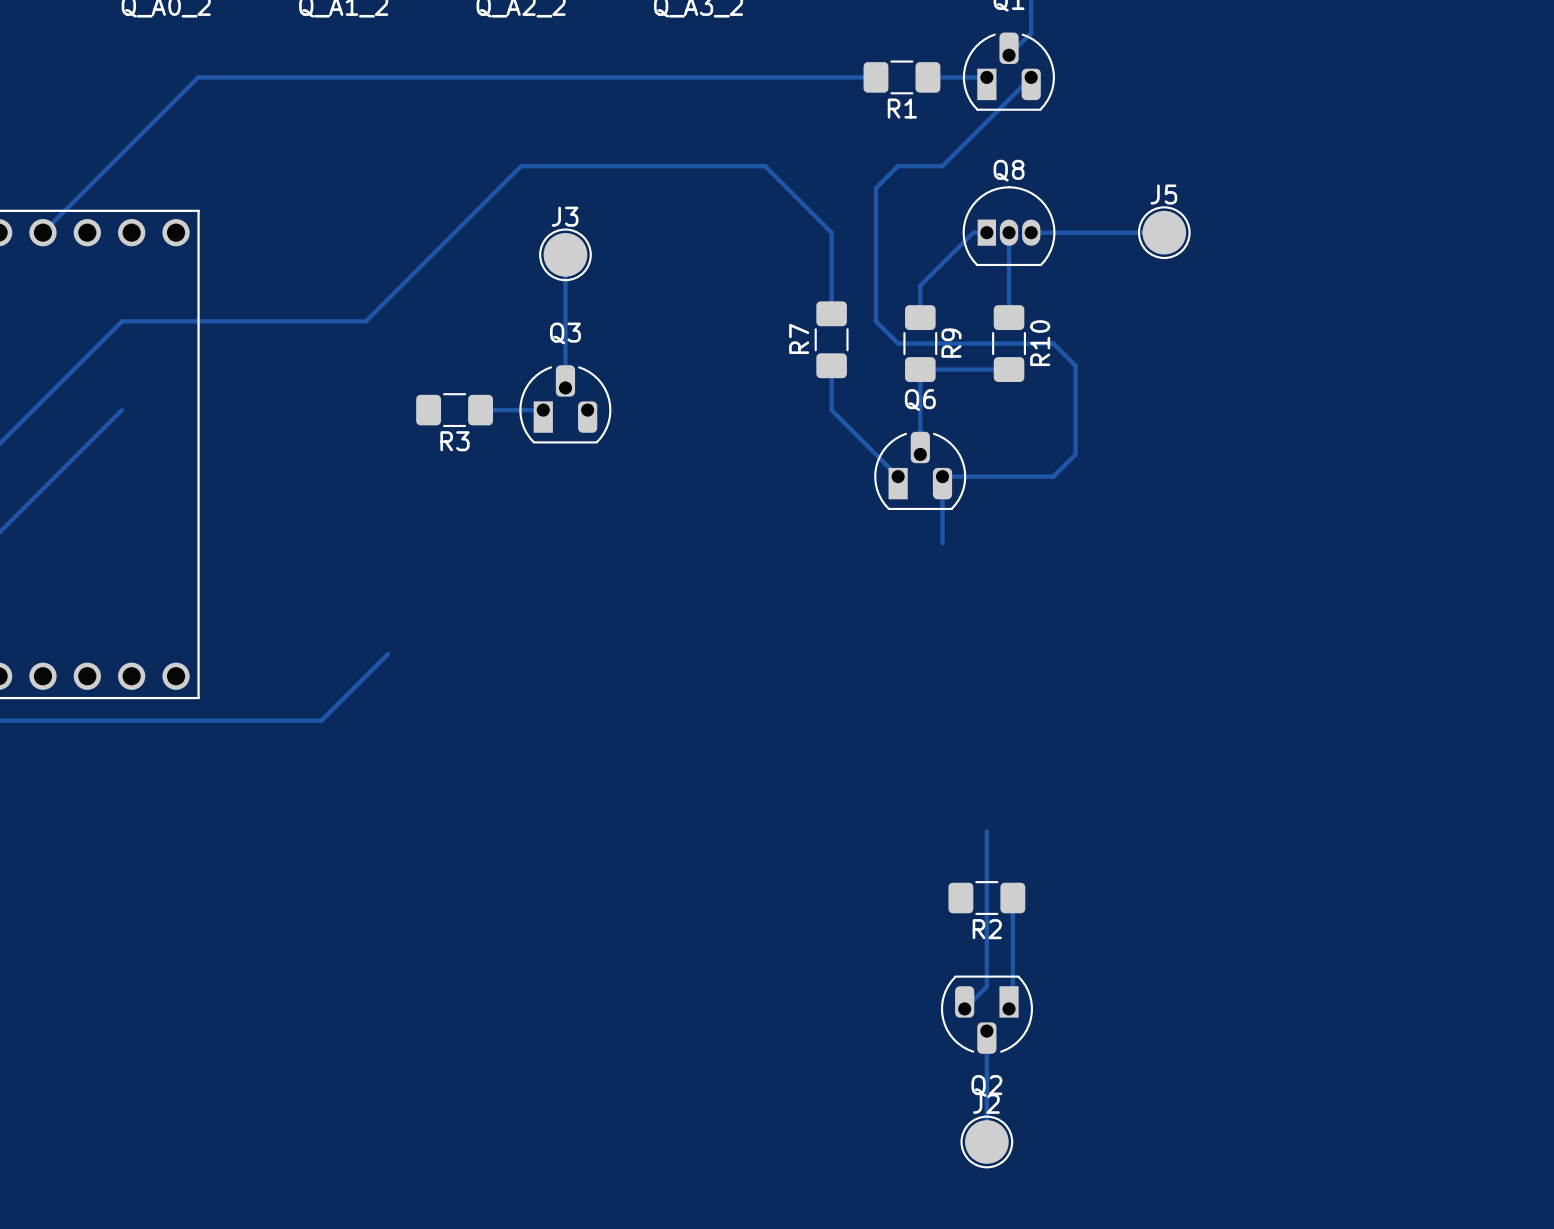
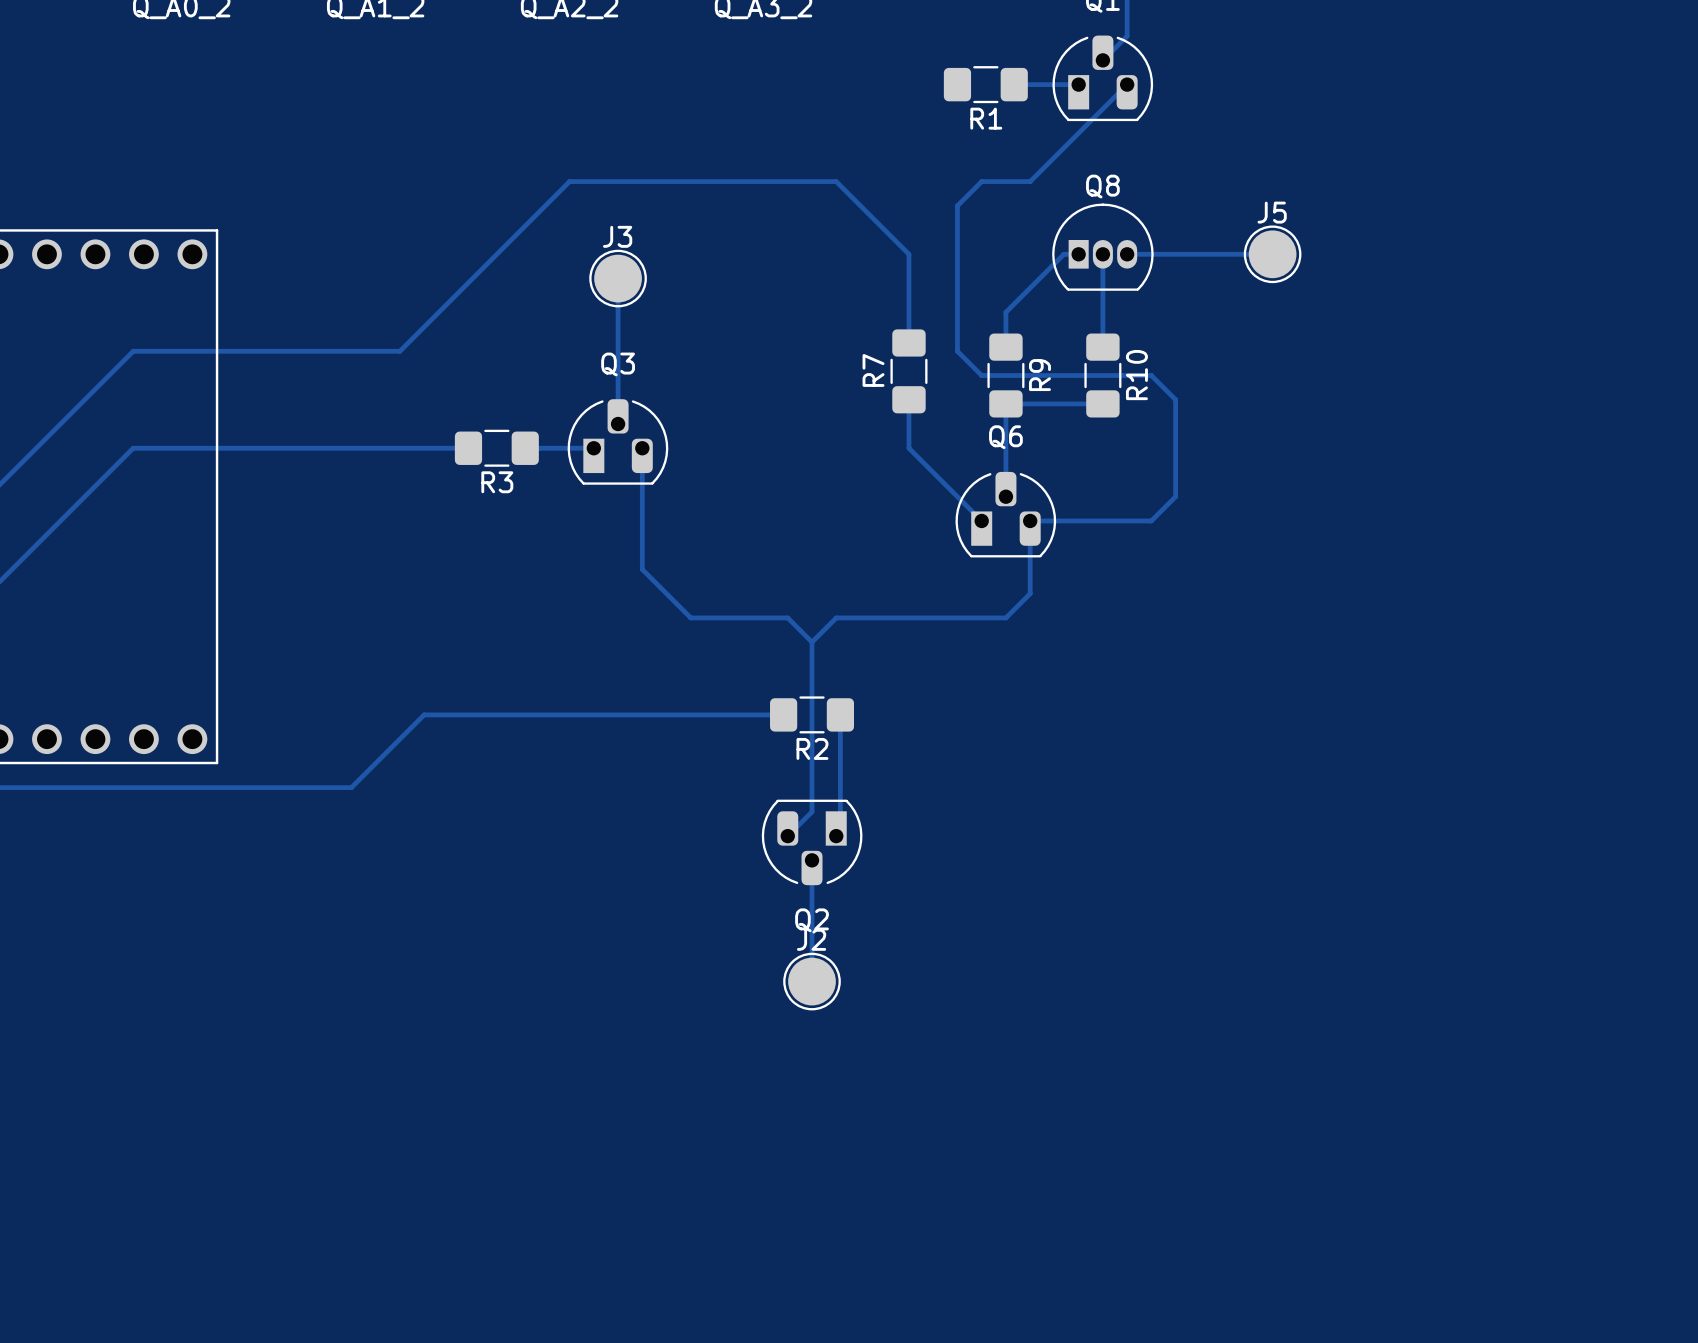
track: (875, 77) (198, 77) (42, 232) -> none
track: none -> (133, 448) (468, 448)
track: none -> (642, 448) (642, 569) (690, 617) (787, 617) (812, 642)
track: none -> (1030, 593) (1005, 617) (836, 617) (812, 642)
track: none -> (424, 714) (783, 714)
track: (986, 831) (986, 986) (964, 1008) -> (812, 642) (812, 811) (787, 836)
R2 position: (986, 898) -> (812, 714)
track: (1012, 898) (1012, 1005) (1009, 1008) -> (840, 714) (840, 831) (836, 836)
Q2 position: (986, 1014) -> (812, 842)
track: (986, 1031) (986, 1141) -> (812, 860) (812, 981)
J2 position: (986, 1141) -> (812, 981)

